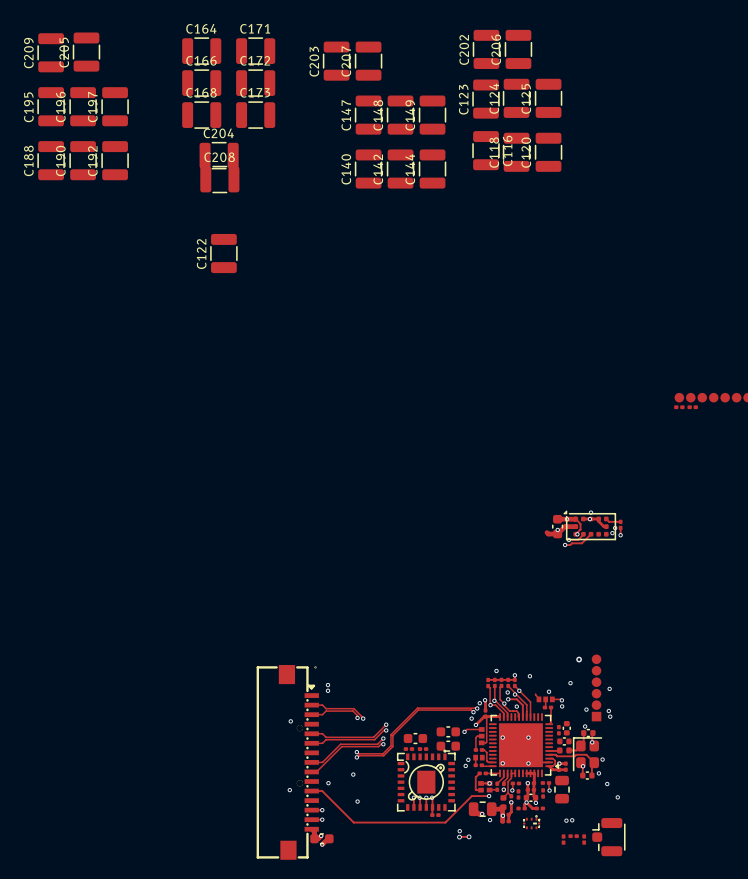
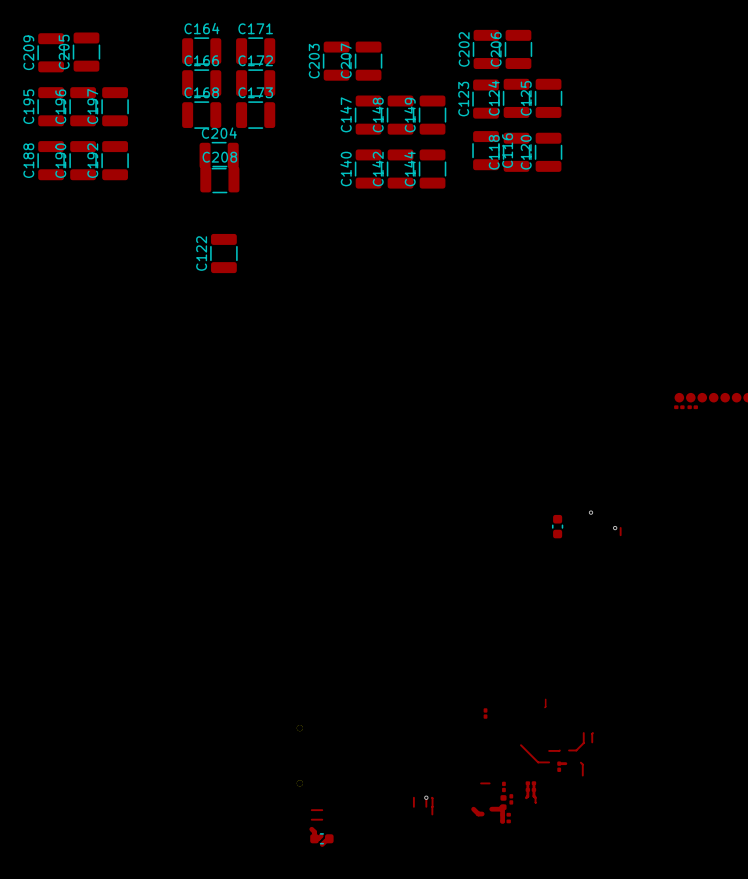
track: (575, 518) (557, 519) -> none
track: (583, 518) (598, 518) (603, 526) (606, 526) -> none
track: (606, 518) (609, 521) (620, 521) -> none
via: (567, 519) -> none
via: (589, 519) -> none
track: (574, 520) (580, 523) (580, 529) (575, 534) -> none
part: (620, 524) -> none
part: (589, 525) -> none
track: (575, 526) (565, 526) (557, 534) (546, 532) -> none
via: (557, 529) -> none
via: (612, 533) -> none
via: (577, 534) -> none
track: (583, 534) (578, 539) (568, 539) -> none
track: (591, 534) (581, 543) (565, 545) -> none
via: (620, 535) -> none
via: (568, 539) -> none
via: (565, 545) -> none
via: (579, 659) -> none
via: (496, 670) -> none
track: (514, 675) (514, 679) (488, 679) -> none
via: (514, 675) -> none
via: (529, 676) -> none
part: (494, 682) -> none
part: (501, 682) -> none
part: (508, 682) -> none
part: (514, 682) -> none
part: (488, 683) -> none
via: (570, 683) -> none
via: (327, 685) -> none
track: (501, 685) (500, 699) (509, 711) -> none
track: (488, 686) (490, 688) (490, 704) (495, 705) (503, 713) (503, 717) -> none
track: (494, 686) (494, 700) (507, 713) (507, 717) -> none
track: (508, 686) (526, 704) (526, 711) -> none
track: (514, 686) (530, 701) (530, 717) -> none
part: (596, 687) -> none
via: (609, 688) -> none
via: (327, 690) -> none
via: (519, 690) -> none
via: (549, 691) -> none
via: (507, 692) -> none
via: (515, 694) -> none
track: (535, 694) (538, 699) -> none
track: (508, 699) (516, 699) (522, 705) (522, 717) -> none
via: (508, 699) -> none
part: (545, 699) -> none
track: (552, 699) (561, 700) -> none
via: (485, 700) -> none
via: (494, 700) -> none
via: (561, 700) -> none
track: (485, 701) (485, 710) -> none
via: (479, 703) -> none
via: (504, 703) -> none
track: (311, 705) (322, 705) (326, 708) (354, 708) (363, 718) -> none
via: (490, 705) -> none
via: (516, 706) -> none
via: (562, 706) -> none
part: (547, 707) -> none
track: (551, 707) (551, 722) (549, 724) -> none
track: (477, 708) (417, 708) (391, 734) (391, 745) (382, 753) (359, 753) (356, 752) -> none
via: (477, 708) -> none
via: (586, 709) -> none
track: (473, 710) (473, 712) (471, 710) (418, 710) (392, 735) (392, 746) (383, 755) (359, 755) (356, 757) -> none
track: (509, 711) (516, 711) (519, 717) -> none
via: (608, 711) -> none
via: (473, 712) -> none
track: (311, 714) (322, 714) (326, 711) (353, 711) (357, 717) -> none
track: (485, 716) (486, 742) (481, 742) -> none
via: (610, 716) -> none
via: (357, 717) -> none
track: (499, 717) (484, 716) (475, 724) -> none
via: (363, 718) -> none
via: (471, 718) -> none
via: (290, 721) -> none
track: (386, 724) (373, 737) (326, 737) (322, 733) (311, 733) -> none
via: (386, 724) -> none
via: (475, 724) -> none
via: (585, 726) -> none
part: (566, 728) -> none
track: (481, 729) (466, 729) (464, 731) -> none
track: (386, 730) (374, 739) (326, 739) (322, 743) (311, 743) -> none
via: (386, 730) -> none
part: (558, 730) -> none
part: (448, 731) -> none
via: (464, 731) -> none
part: (588, 733) -> none
track: (481, 736) (475, 737) (475, 750) -> none
part: (481, 736) -> none
via: (502, 737) -> none
via: (528, 737) -> none
track: (383, 738) (377, 744) (340, 744) (322, 762) (311, 762) -> none
via: (383, 738) -> none
part: (415, 738) -> none
part: (564, 741) -> none
via: (592, 742) -> none
track: (383, 744) (378, 746) (341, 746) (316, 771) (311, 771) -> none
via: (383, 744) -> none
part: (524, 745) -> none
part: (448, 746) -> none
part: (408, 749) -> none
part: (423, 749) -> none
part: (478, 750) -> none
track: (482, 750) (486, 752) (486, 760) (492, 762) -> none
part: (564, 750) -> none
via: (356, 752) -> none
track: (549, 754) (557, 756) (586, 754) (594, 762) (591, 764) (591, 775) -> none
part: (587, 754) -> none
via: (356, 757) -> none
track: (475, 757) (475, 765) -> none
part: (478, 757) -> none
track: (549, 758) (555, 760) (552, 766) (549, 766) (552, 769) (565, 769) -> none
via: (468, 759) -> none
via: (602, 759) -> none
part: (287, 762) -> none
via: (502, 763) -> none
via: (528, 763) -> none
via: (559, 763) -> none
via: (465, 765) -> none
part: (478, 765) -> none
track: (481, 765) (492, 766) -> none
part: (565, 766) -> none
via: (583, 766) -> none
track: (479, 773) (475, 777) (475, 789) (481, 790) -> none
part: (482, 773) -> none
track: (485, 773) (499, 773) -> none
track: (503, 773) (503, 777) (497, 783) -> none
track: (507, 773) (507, 778) (503, 783) -> none
track: (515, 773) (511, 773) (511, 778) (508, 781) (508, 793) -> none
track: (526, 773) (534, 773) (533, 783) -> none
via: (598, 773) -> none
via: (353, 774) -> none
part: (587, 775) -> none
part: (426, 780) -> none
part: (545, 782) -> none
track: (548, 782) (549, 790) -> none
via: (328, 783) -> none
via: (489, 783) -> none
part: (515, 783) -> none
via: (527, 783) -> none
track: (512, 784) (512, 790) -> none
via: (607, 784) -> none
part: (481, 786) -> none
part: (489, 786) -> none
part: (497, 786) -> none
track: (497, 789) (489, 790) -> none
via: (503, 789) -> none
part: (562, 789) -> none
via: (289, 790) -> none
via: (512, 790) -> none
via: (549, 790) -> none
track: (311, 791) (322, 791) (353, 822) (445, 822) (471, 796) (489, 796) -> none
track: (508, 793) (511, 796) -> none
track: (508, 793) (503, 797) -> none
part: (543, 793) -> none
part: (518, 794) -> none
via: (489, 796) -> none
via: (413, 797) -> none
track: (419, 797) (420, 806) -> none
via: (419, 797) -> none
via: (432, 797) -> none
part: (530, 797) -> none
via: (617, 797) -> none
via: (357, 801) -> none
track: (511, 802) (508, 821) -> none
via: (511, 802) -> none
via: (526, 802) -> none
via: (535, 802) -> none
part: (521, 808) -> none
track: (524, 808) (526, 802) (532, 808) (536, 808) -> none
part: (539, 808) -> none
part: (482, 809) -> none
via: (322, 810) -> none
via: (482, 814) -> none
part: (435, 815) -> none
via: (502, 815) -> none
via: (322, 819) -> none
via: (490, 820) -> none
via: (566, 820) -> none
via: (572, 820) -> none
part: (531, 822) -> none
via: (459, 831) -> none
via: (321, 835) -> none
track: (469, 836) (459, 837) -> none
via: (469, 836) -> none
part: (573, 836) -> none
via: (459, 837) -> none
part: (608, 837) -> none
part: (563, 839) -> none
part: (584, 839) -> none
via: (322, 844) -> none

